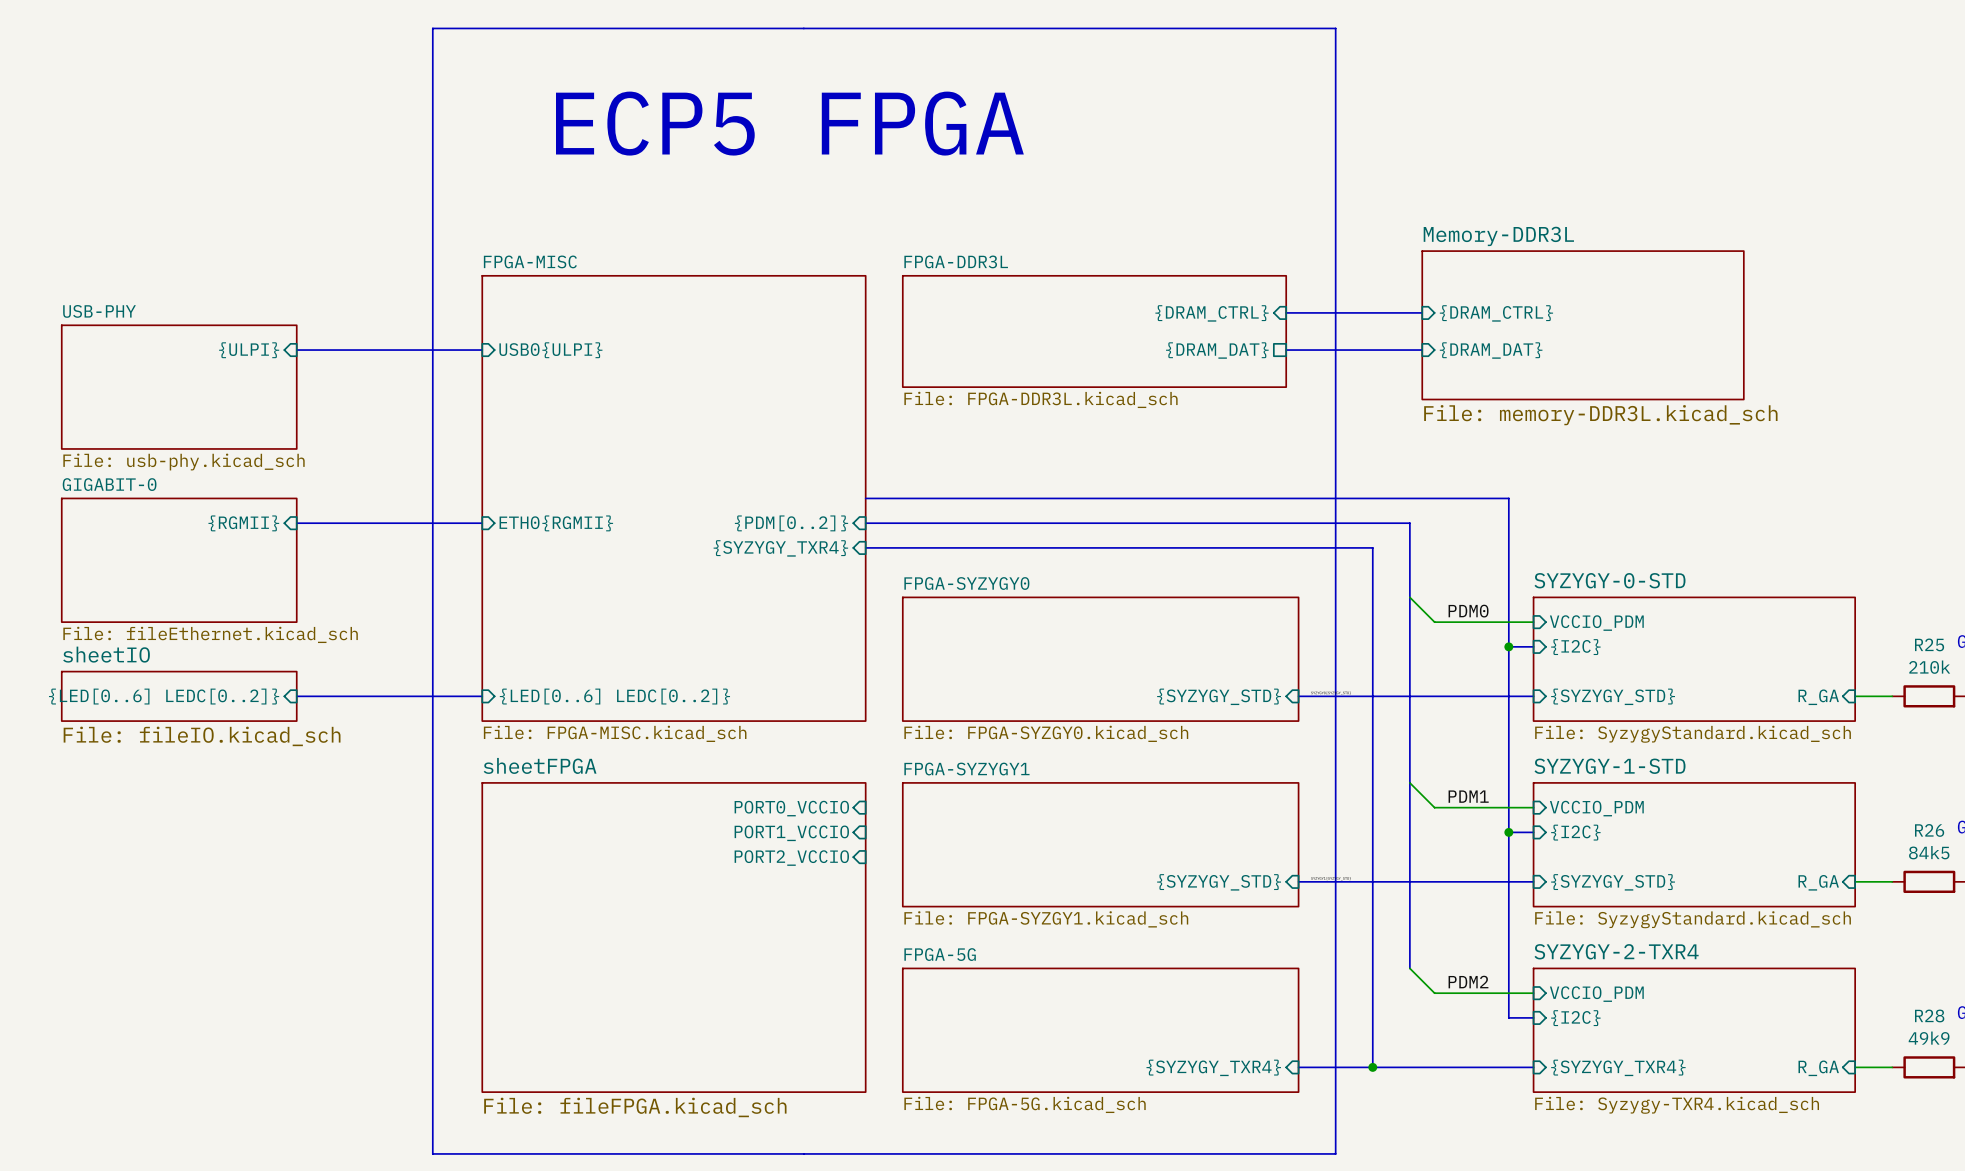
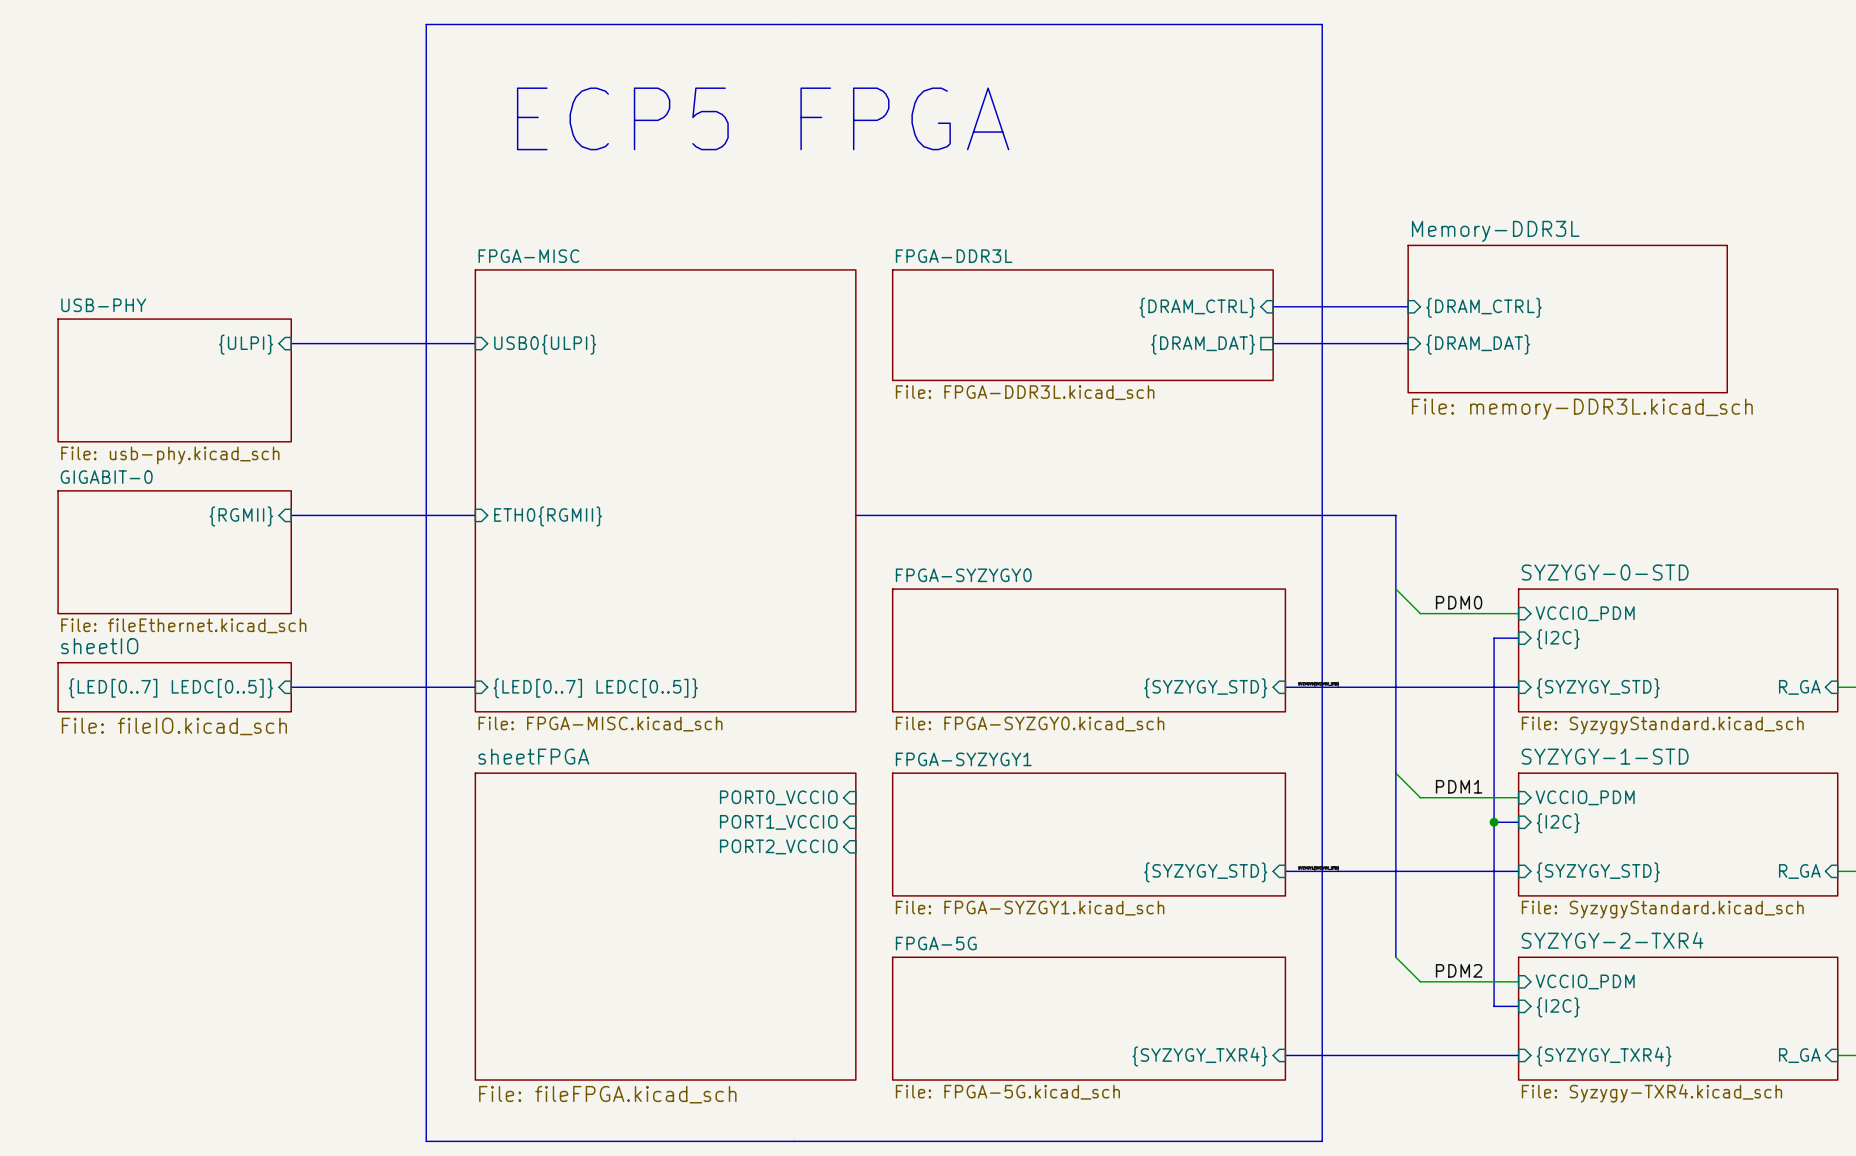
bus: (865, 498) (1508, 498) (1508, 646) -> none
sheet pin: {PDM[0..2]} (791, 523) -> none
bus: (865, 547) (1372, 547) (1372, 1067) -> none
sheet pin: {SYZYGY_TXR4} (780, 548) -> none
junction: (1508, 646) -> none
sheet pin: {LED[0..6] LEDC[0..2]} (164, 696) -> {LED[0..7] LEDC[0..5]} (170, 688)
sheet pin: {LED[0..6] LEDC[0..2]} (614, 696) -> {LED[0..7] LEDC[0..5]} (595, 688)
junction: (1372, 1067) -> none

